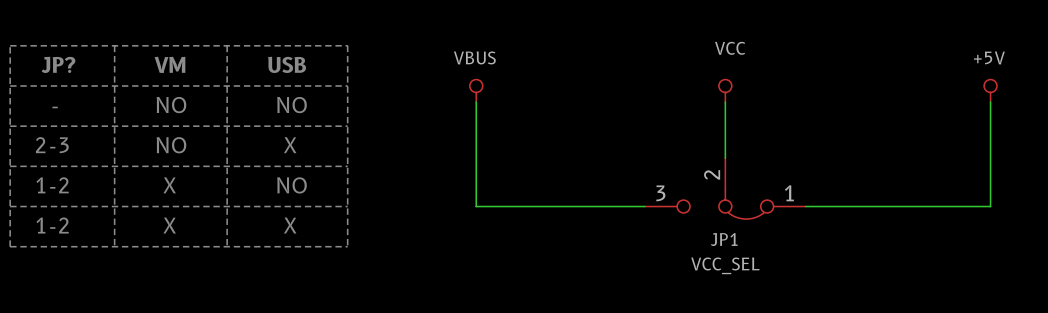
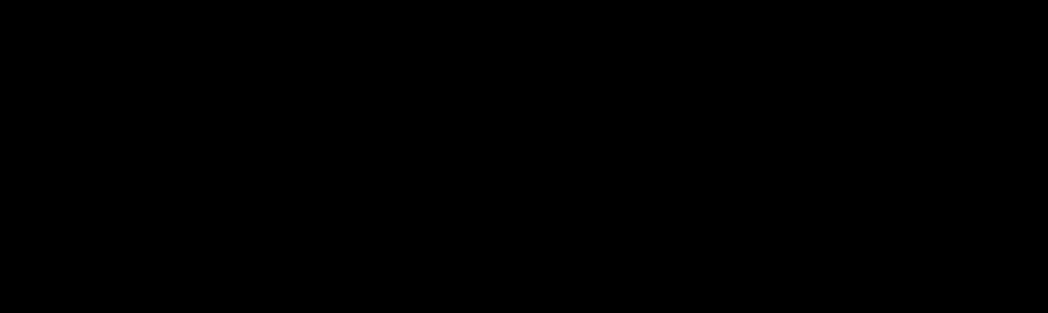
line: (10, 45) (10, 246) (347, 246) (347, 45) (10, 45) -> none
line: (114, 45) (114, 246) -> none
line: (227, 45) (227, 246) -> none
text: JP? (58, 64) -> none
text: VM (169, 64) -> none
text: USB (287, 64) -> none
line: (10, 85) (347, 85) -> none
power symbol: VBUS (476, 90) -> none
power symbol: VCC (725, 90) -> none
power symbol: +5V (990, 90) -> none
wire: (476, 102) (476, 206) (645, 206) -> none
wire: (725, 102) (725, 158) -> none
wire: (990, 102) (990, 206) (805, 206) -> none
text: NO (171, 105) -> none
text: NO (291, 105) -> none
text: - (55, 107) -> none
line: (10, 126) (347, 126) -> none
text: 2-3 (52, 145) -> none
text: NO (171, 145) -> none
text: X (290, 145) -> none
line: (10, 166) (347, 166) -> none
text: 1-2 (52, 185) -> none
text: X (169, 185) -> none
text: NO (291, 185) -> none
JP1: VCC_SEL (725, 188) -> none
line: (10, 206) (347, 206) -> none
text: 1-2 (52, 225) -> none
text: X (169, 225) -> none
text: X (290, 225) -> none

